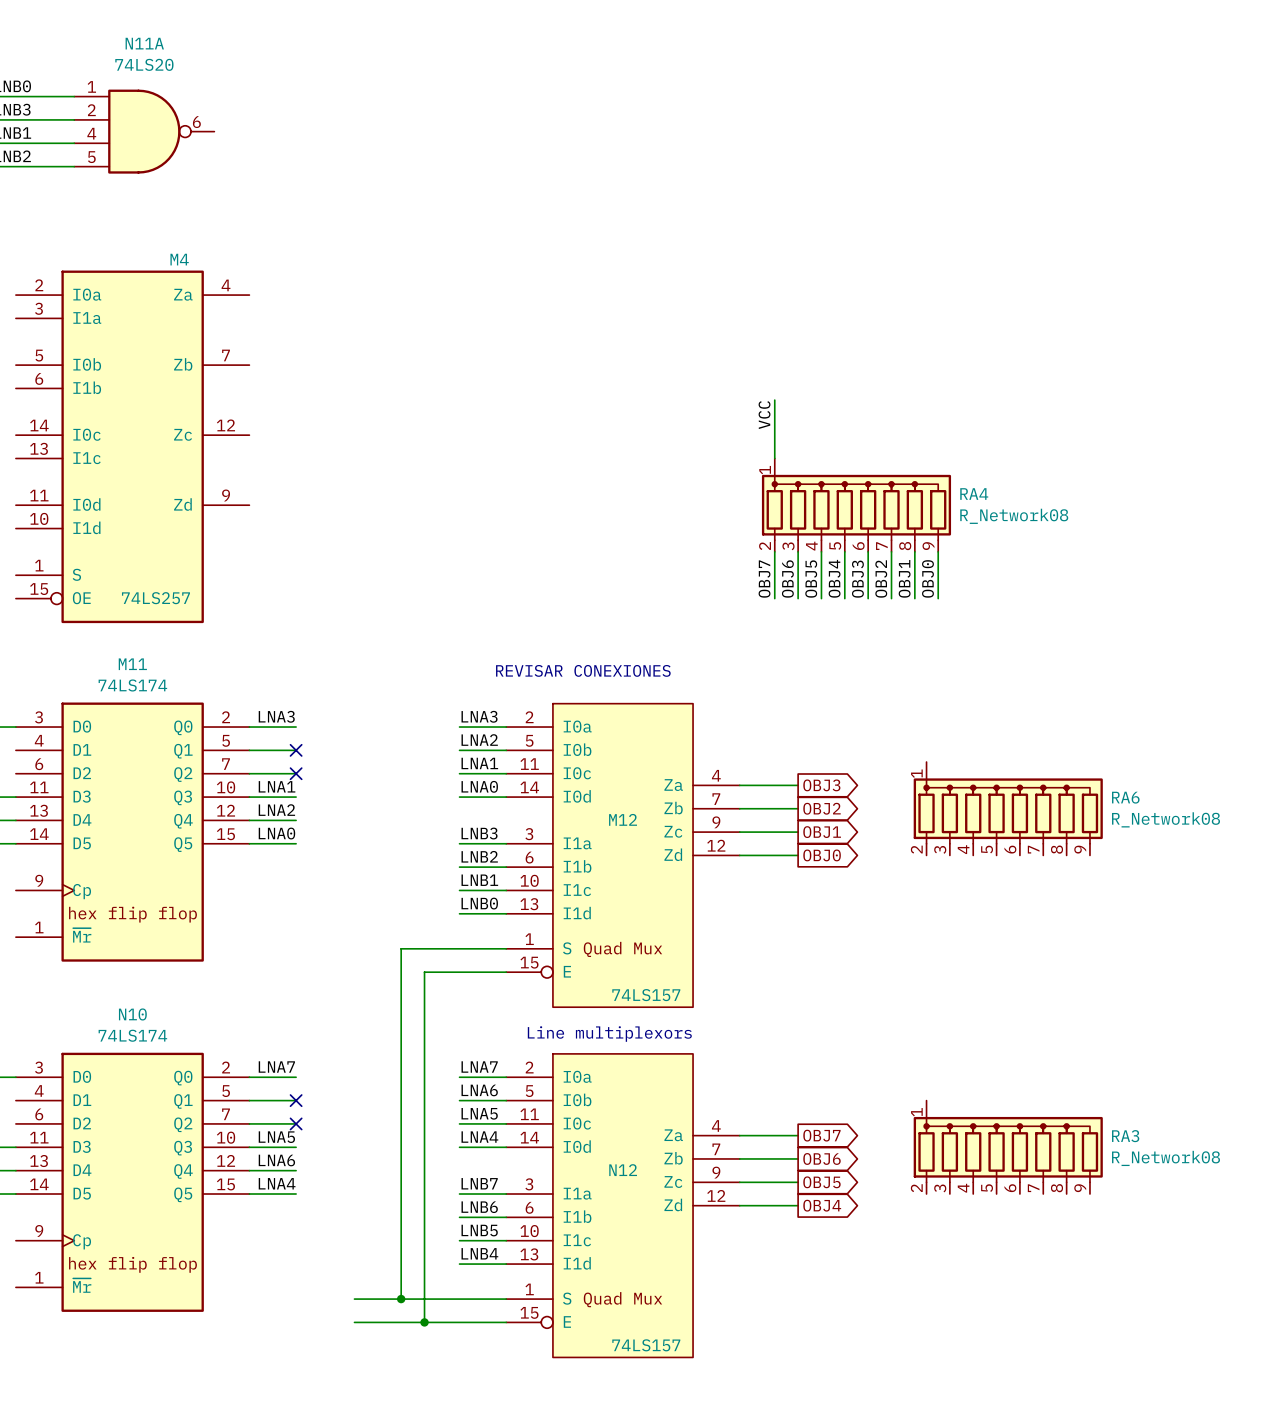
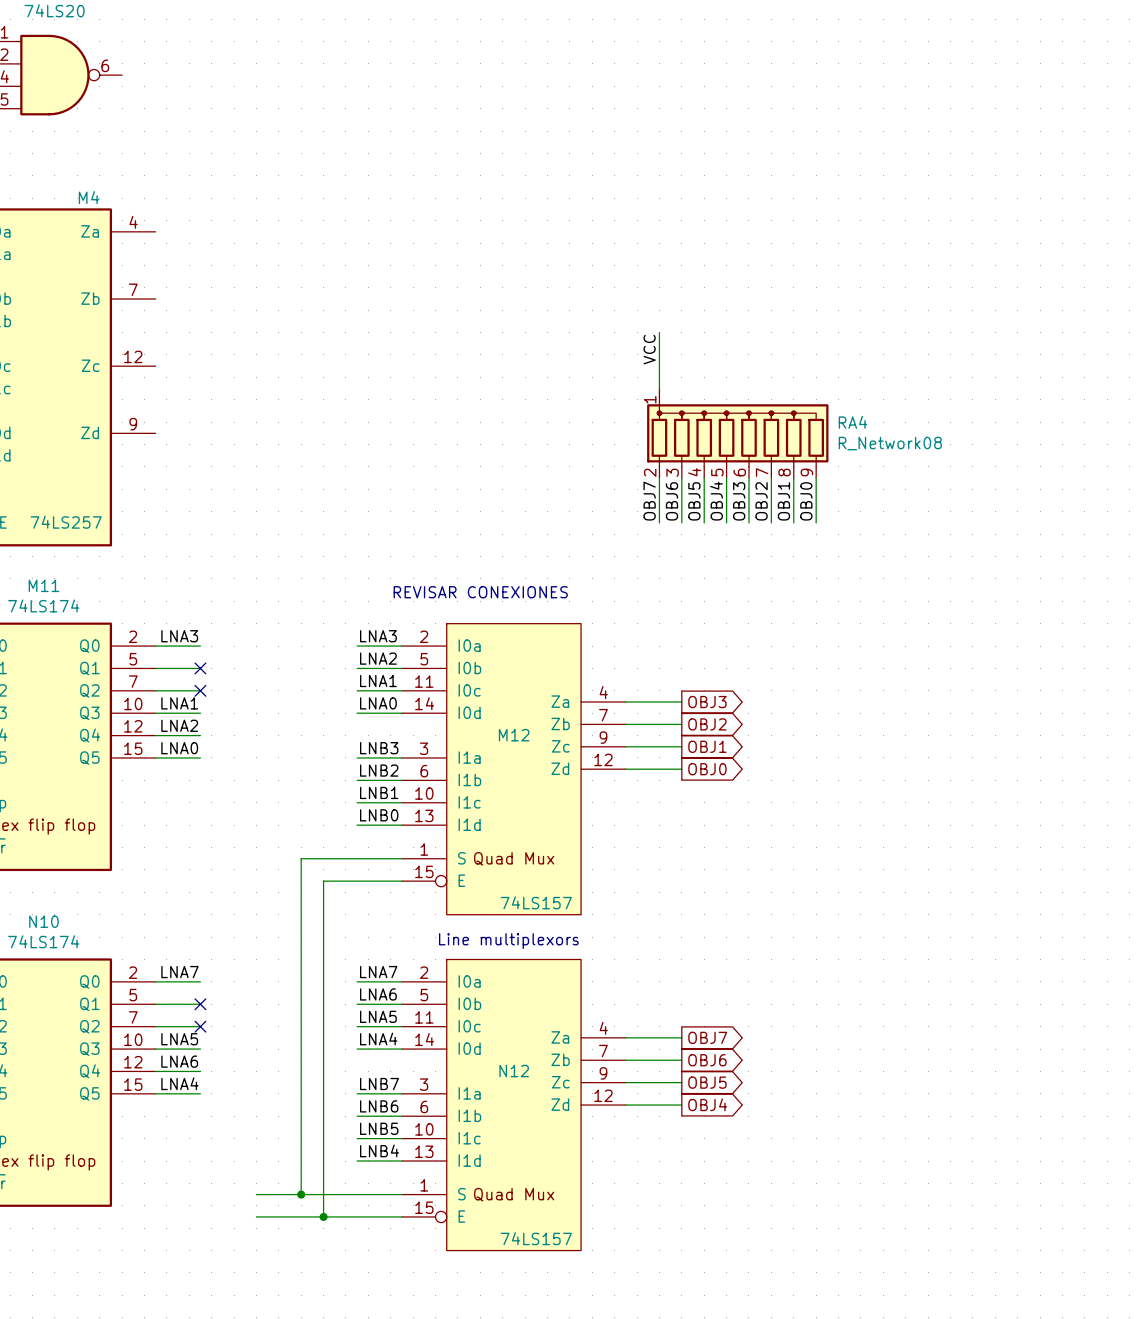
RA6: R_Network08 (1008, 808) -> none
RA3: R_Network08 (1008, 1147) -> none

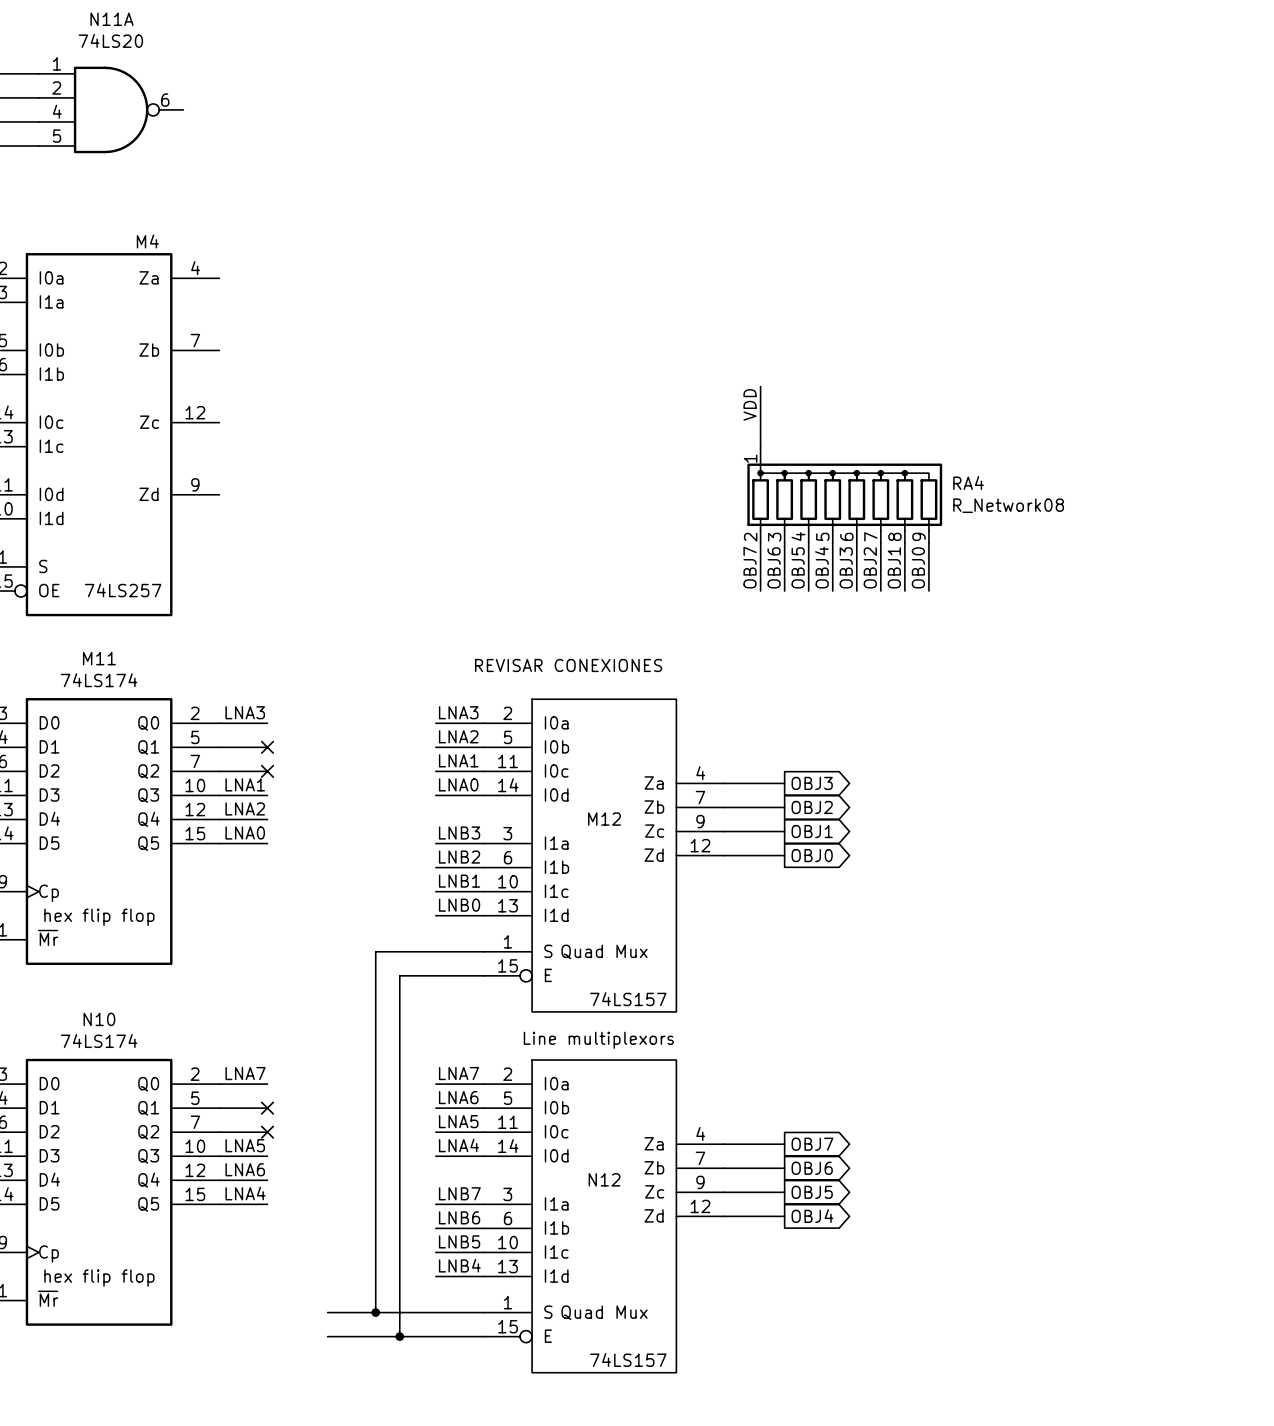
label: VCC (649, 349) -> VDD (750, 404)

